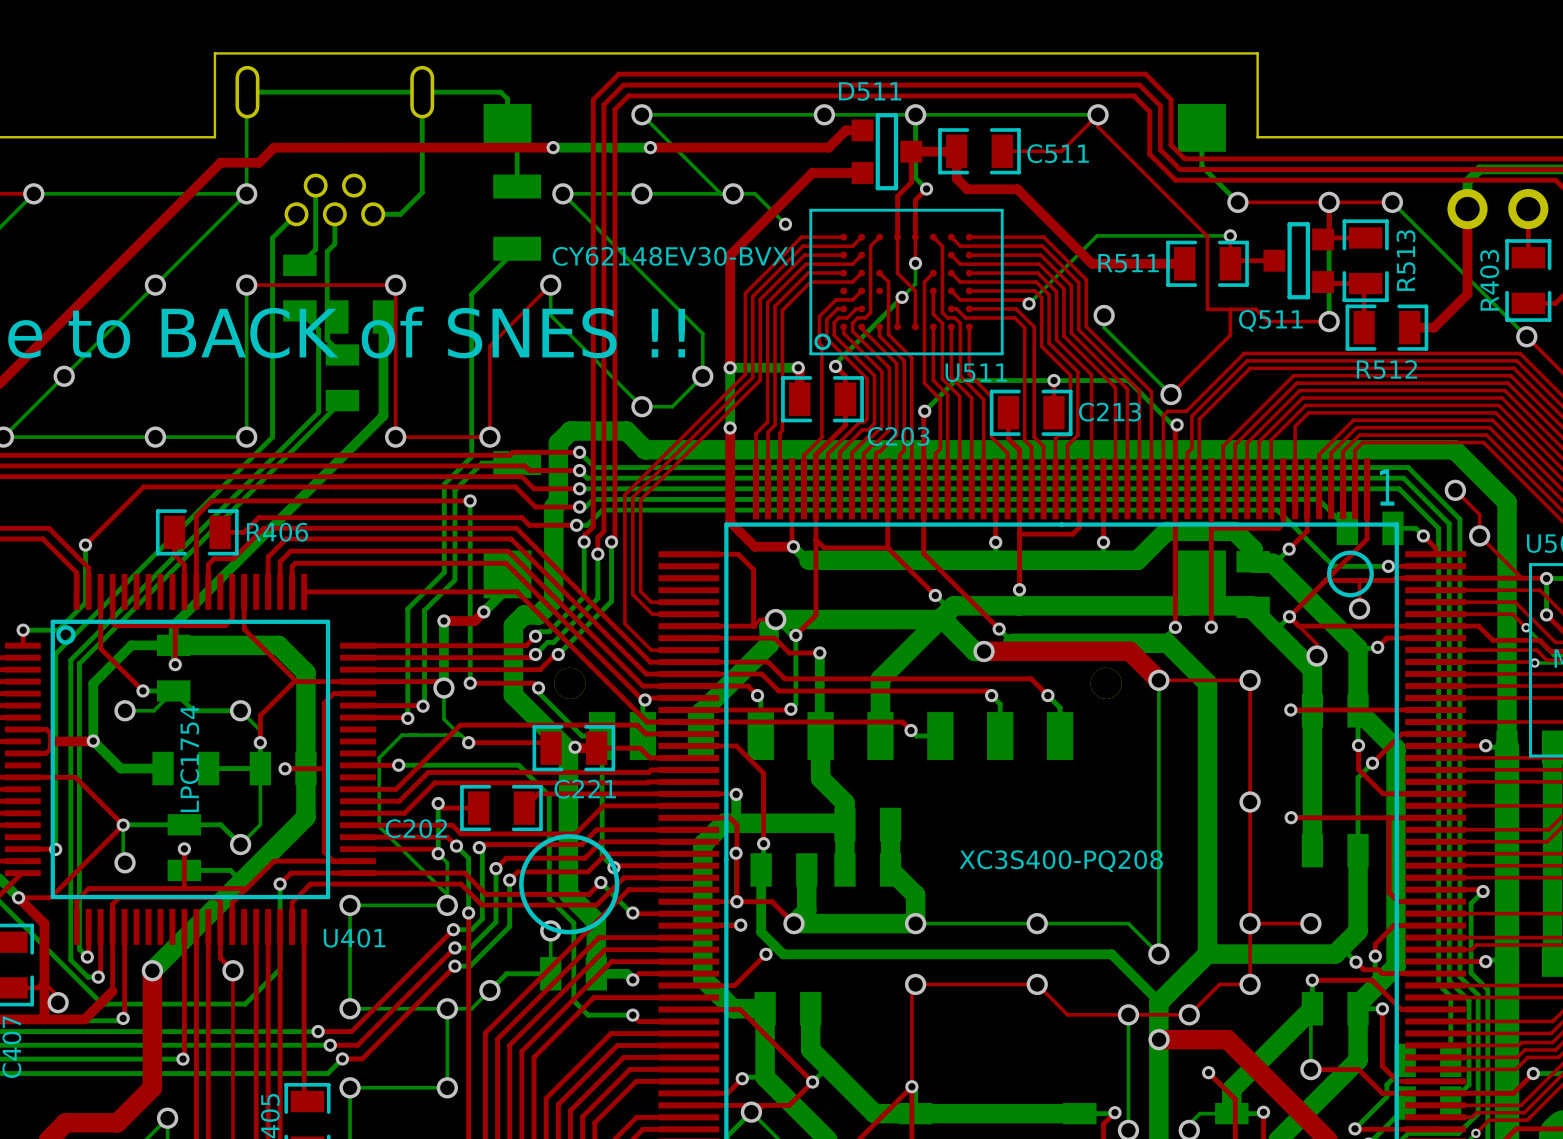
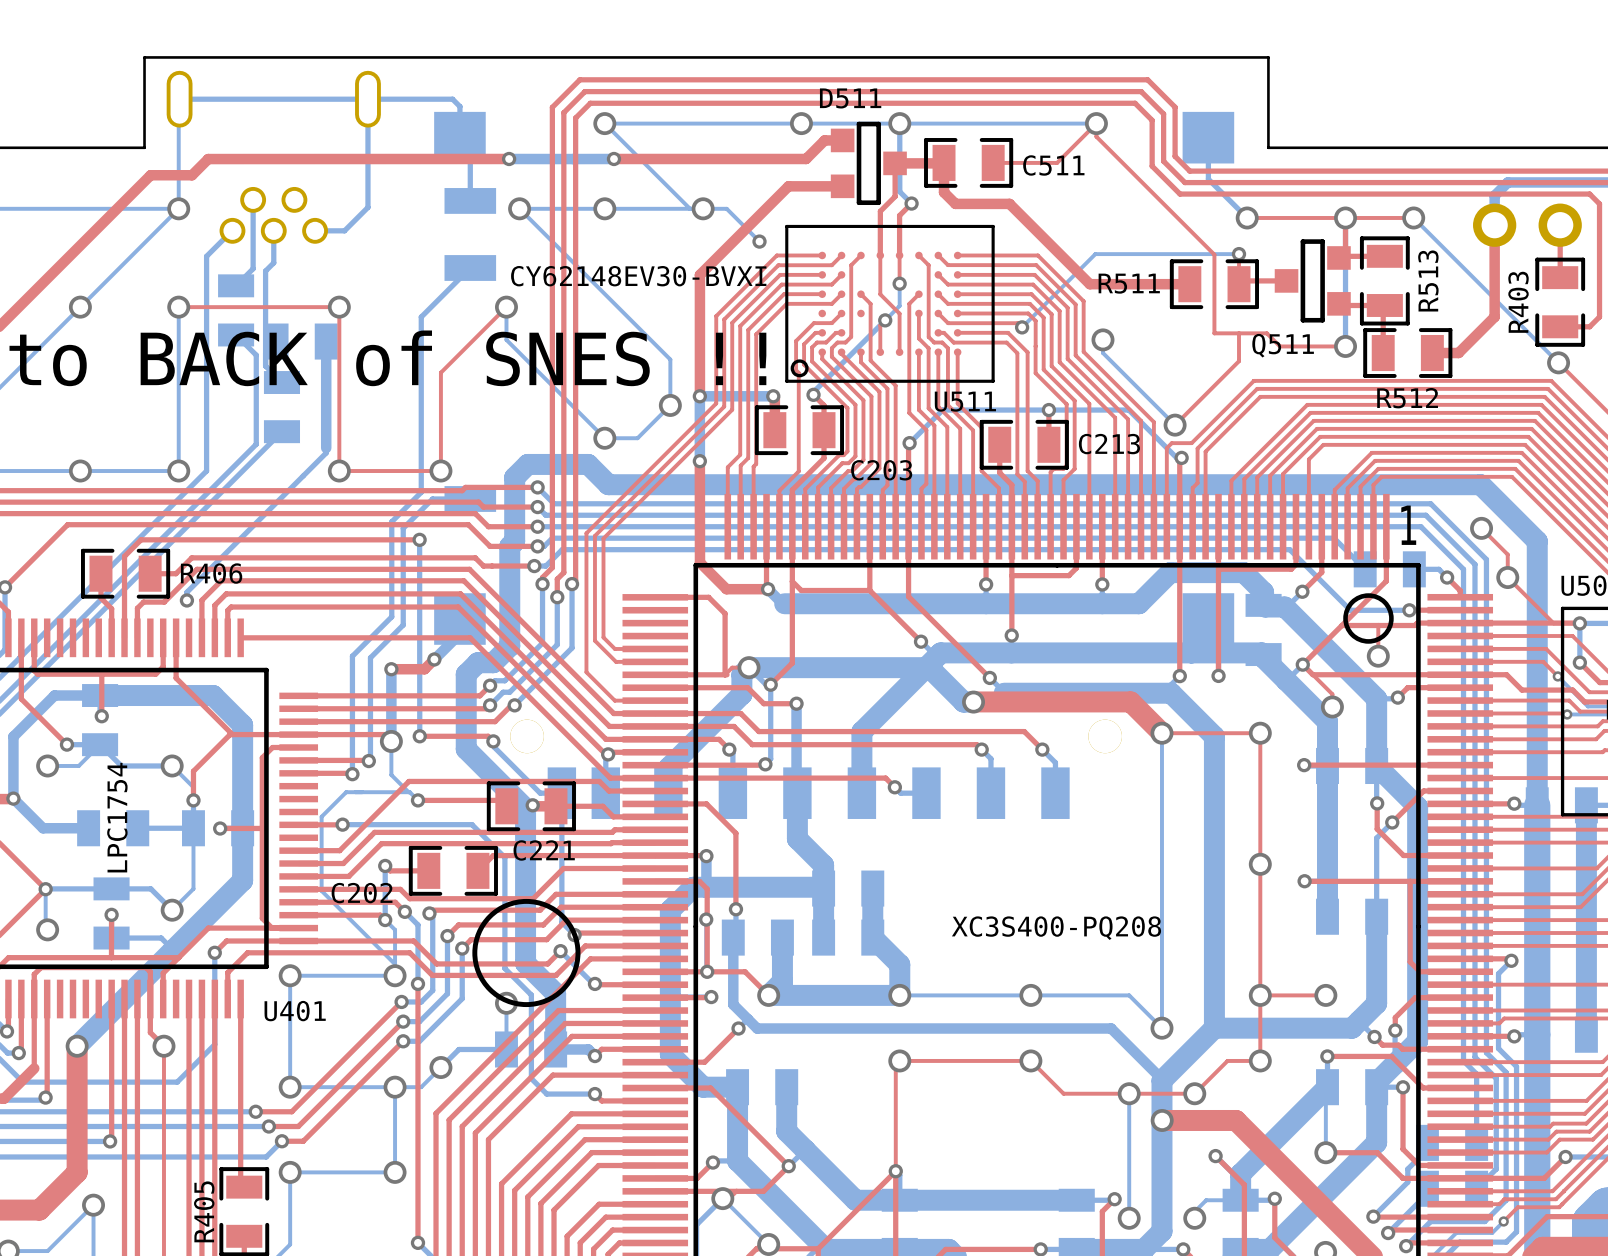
bottom track: (383, 415) (173, 625) (173, 645) -> (326, 448) (326, 452) (186, 592) (186, 600)
via: none -> (186, 600)

